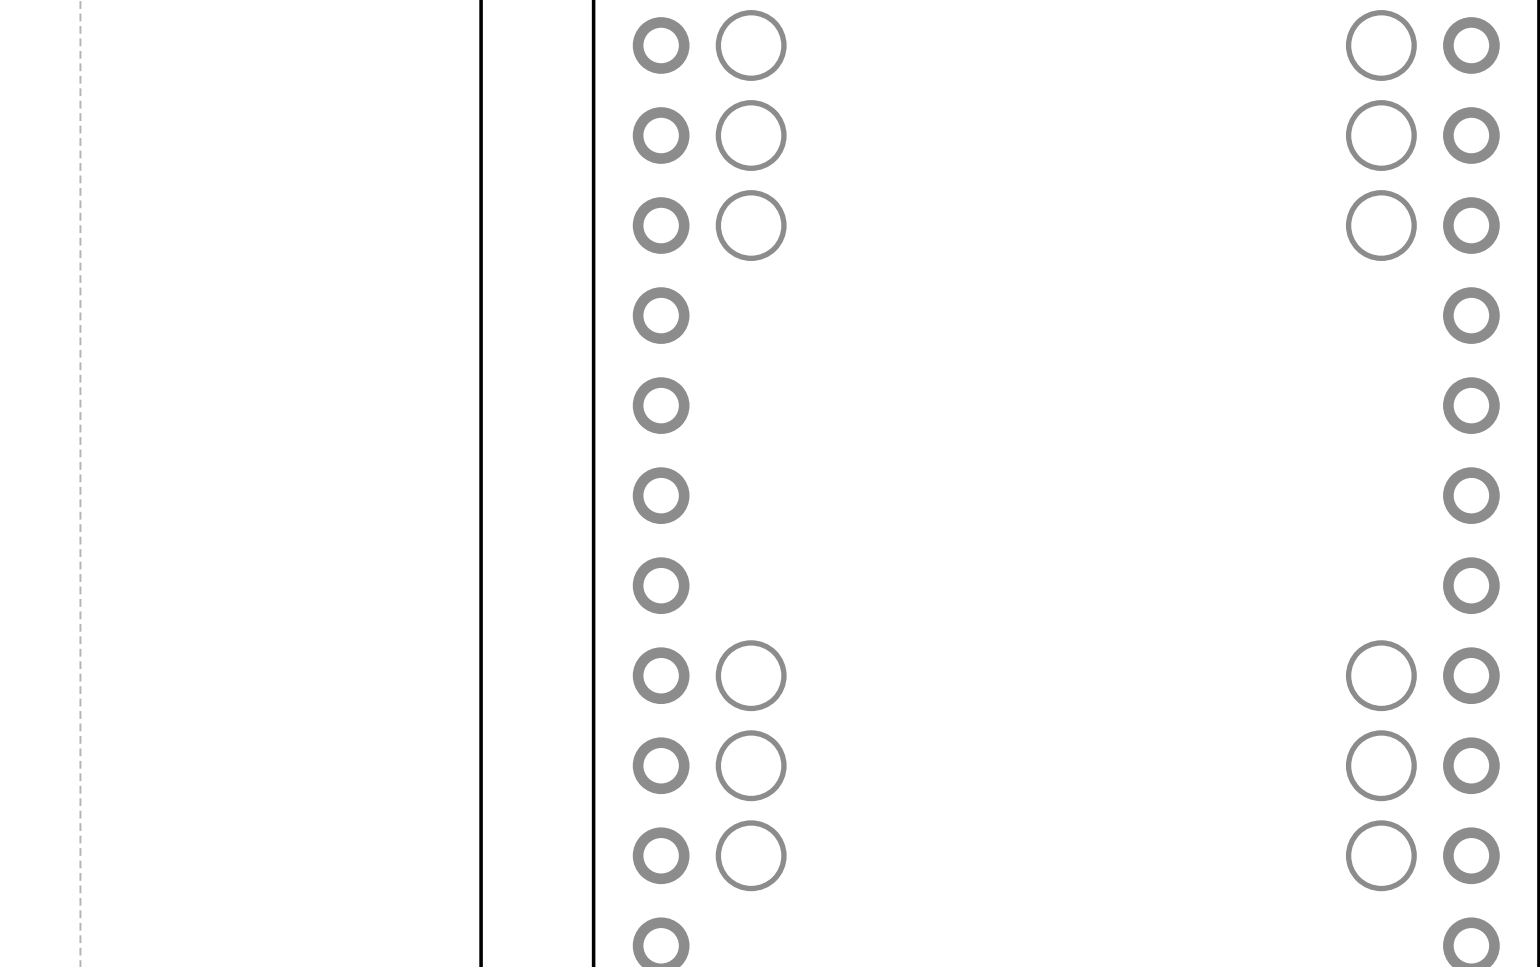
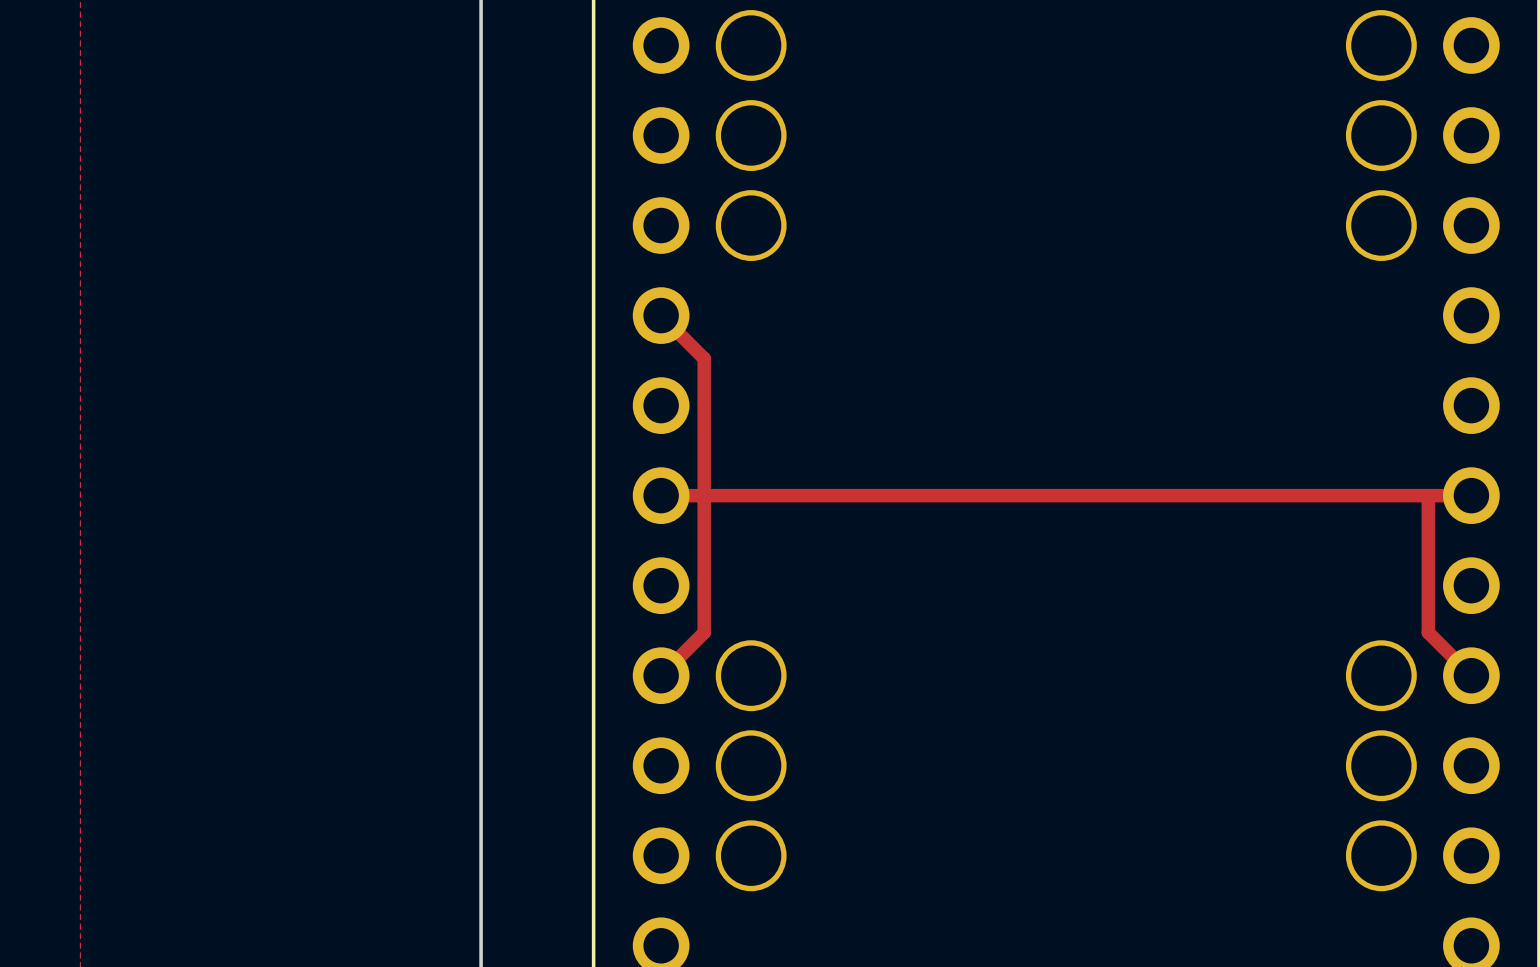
track: none -> (661, 315) (704, 358) (704, 632) (661, 675)
track: none -> (661, 495) (1471, 495)
track: none -> (1428, 495) (1428, 632) (1471, 675)

